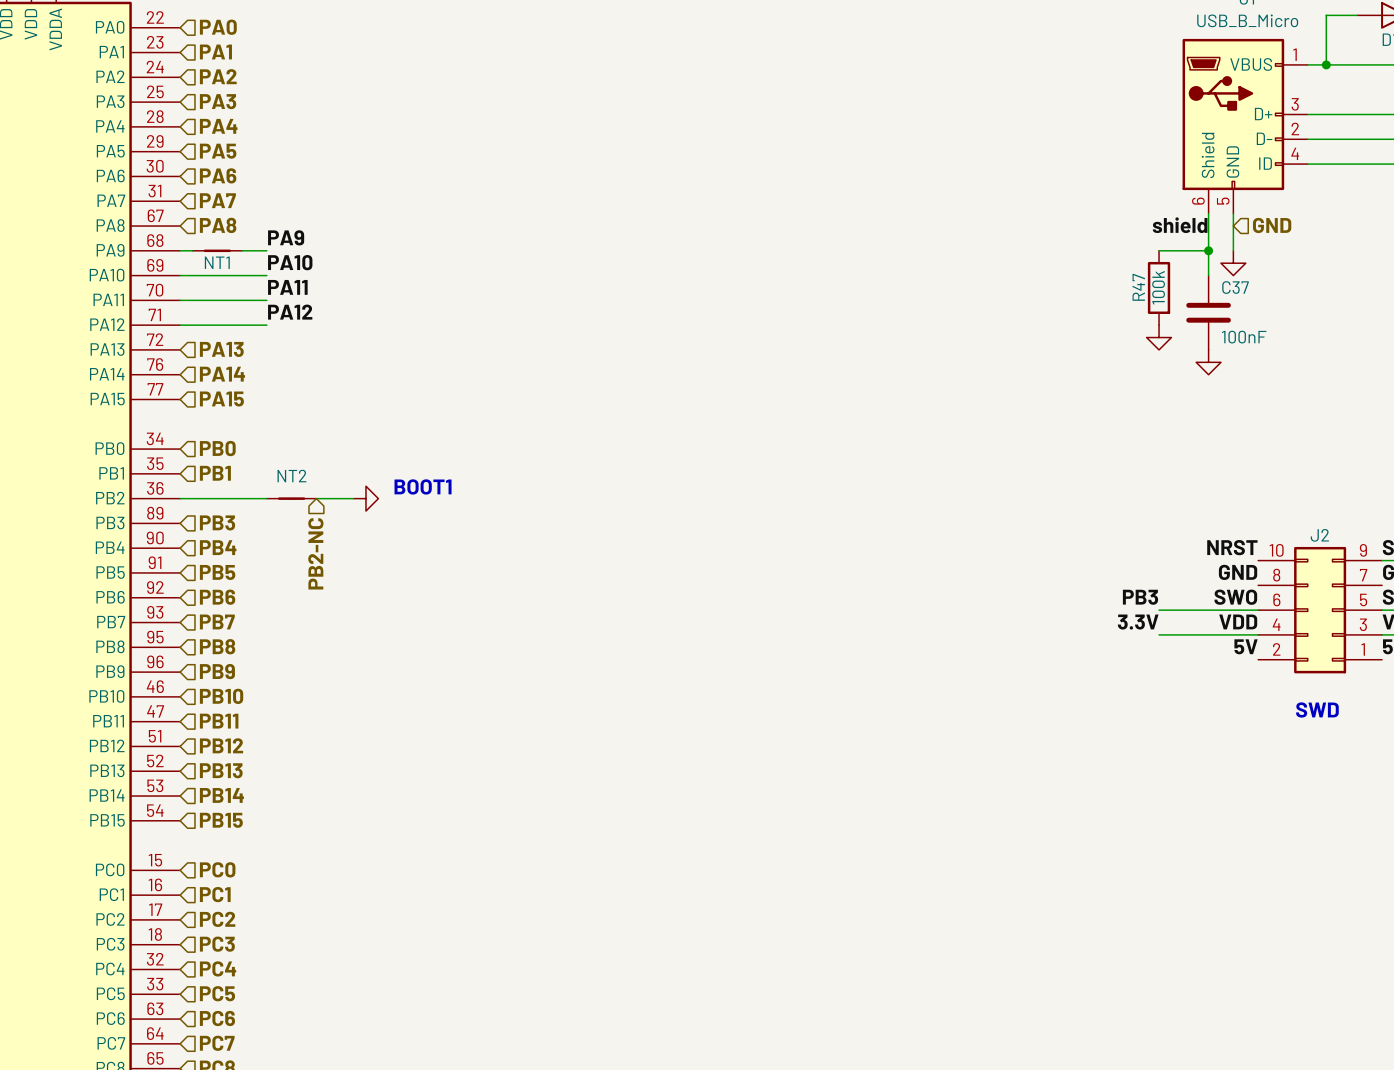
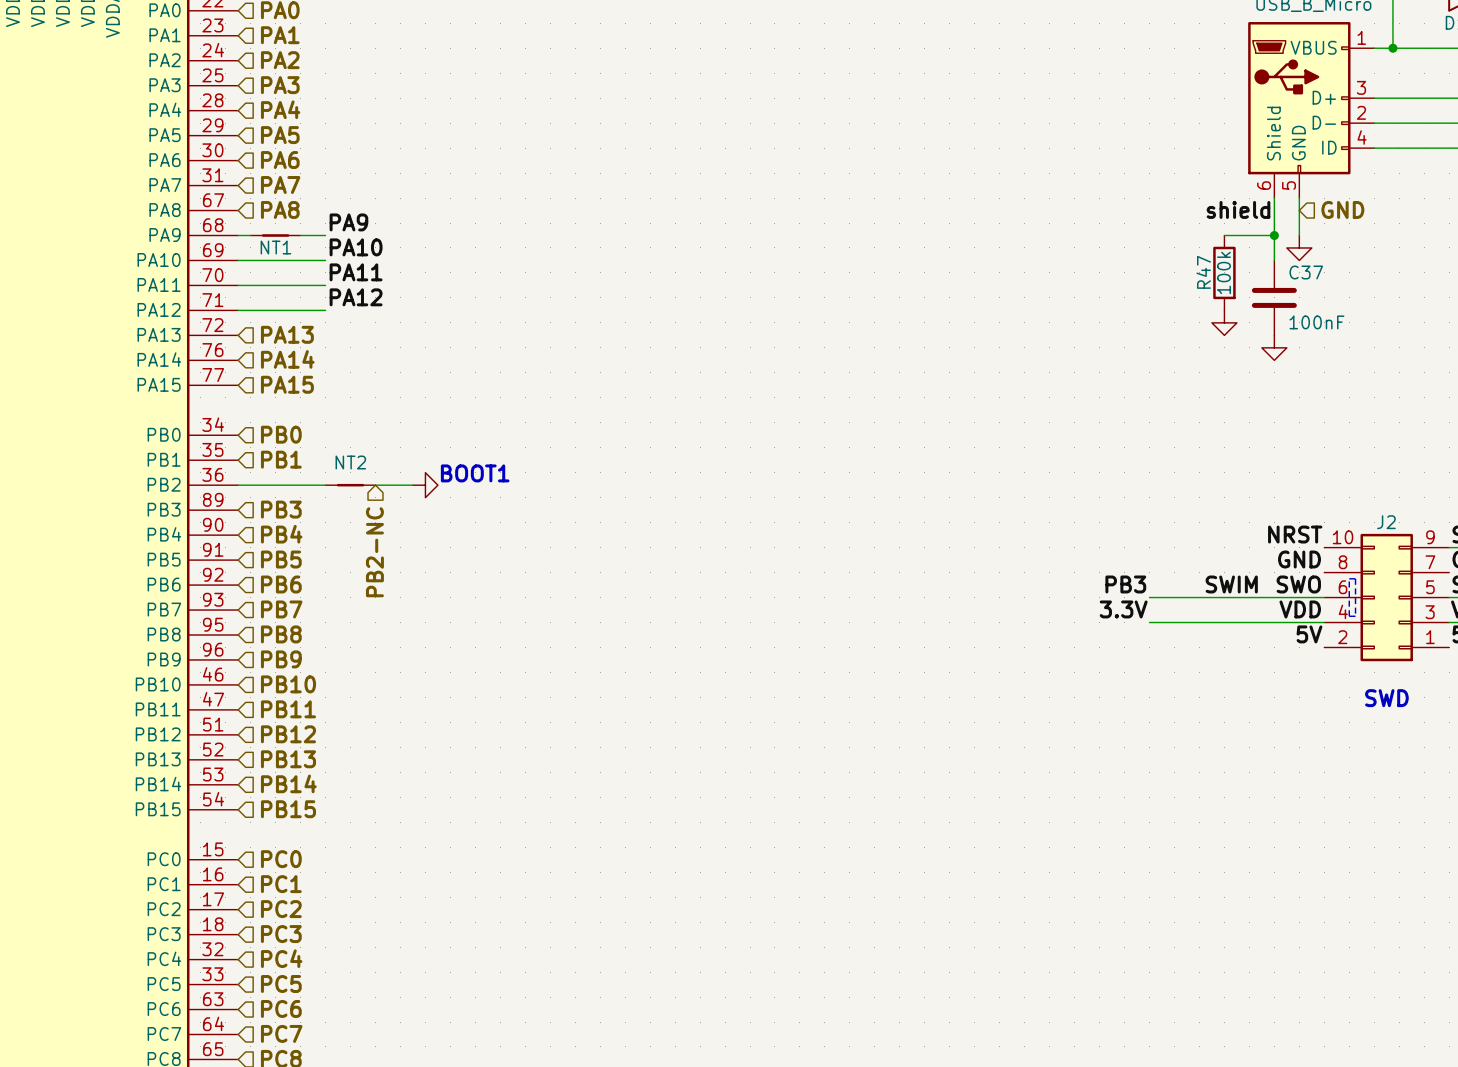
line: none -> (1349, 578) (1355, 578) (1355, 616) (1349, 616) (1349, 578)
label position: PB3 (1140, 597) -> PB3 (1125, 584)
label: none -> SWIM (1231, 584)
wire: none -> (1149, 597) (1224, 597)
label position: 3.3V (1138, 622) -> 3.3V (1123, 609)
wire: none -> (1149, 622) (1224, 622)

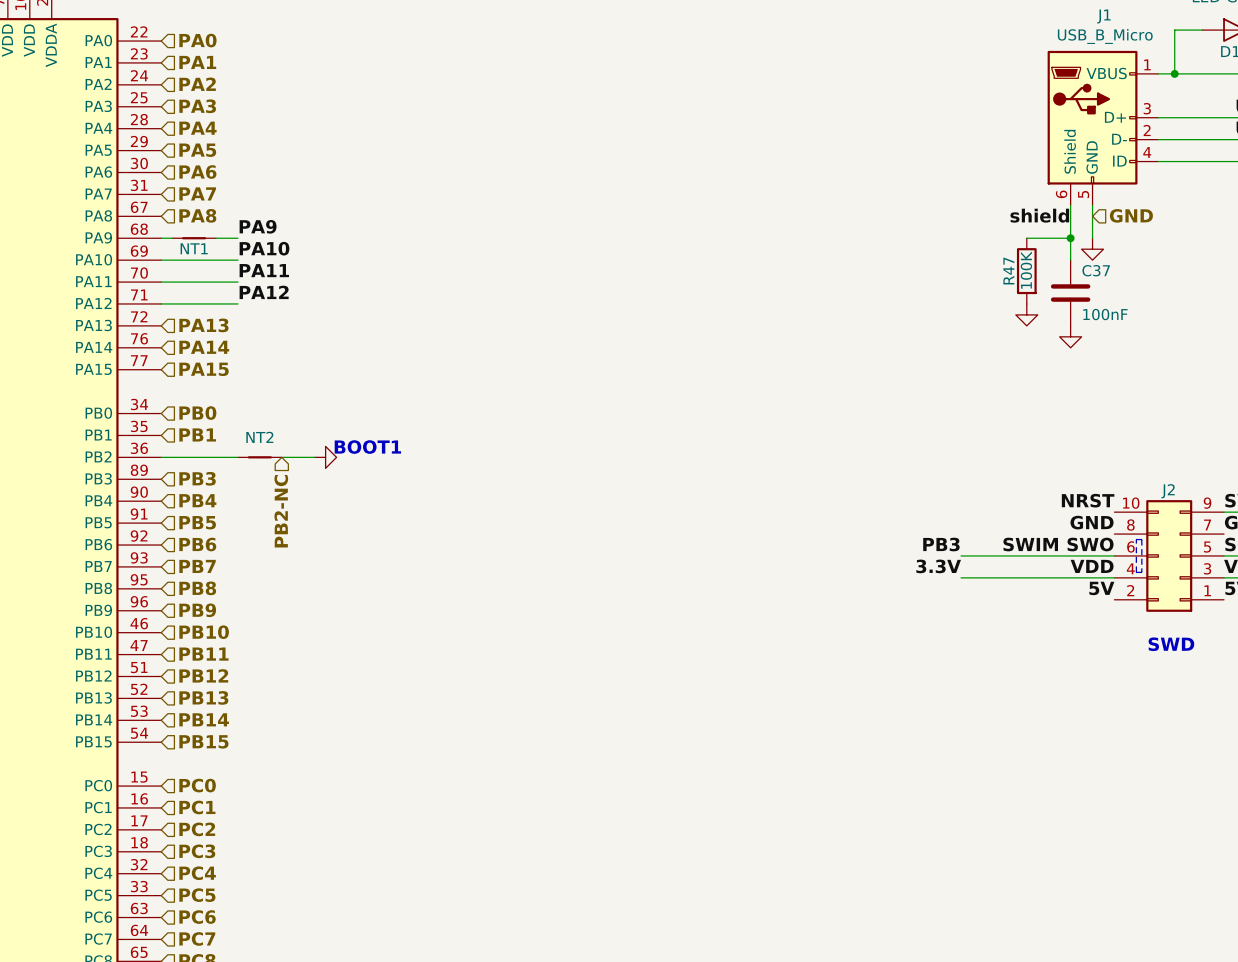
R47 value: 100k (1223, 272) -> 100K (1026, 270)

